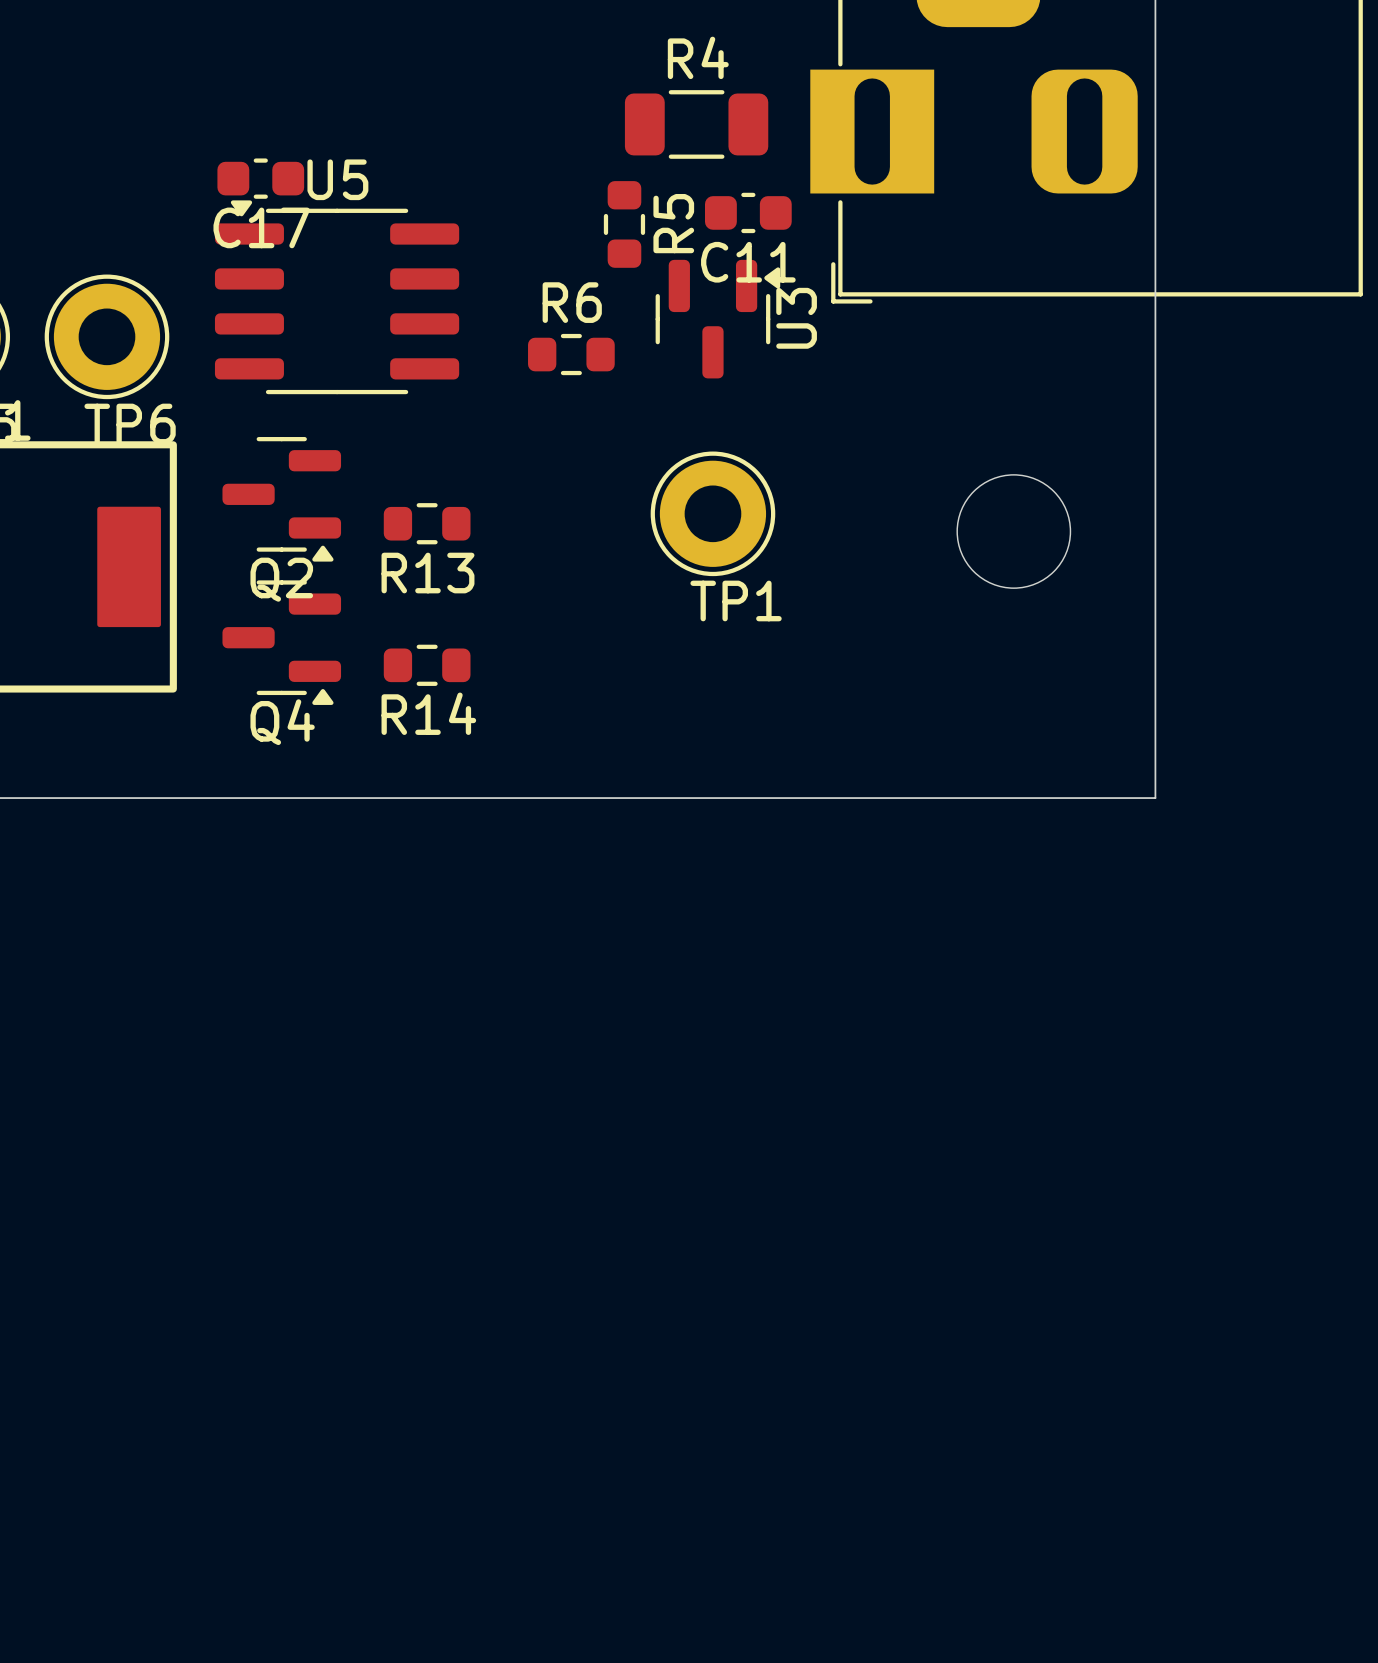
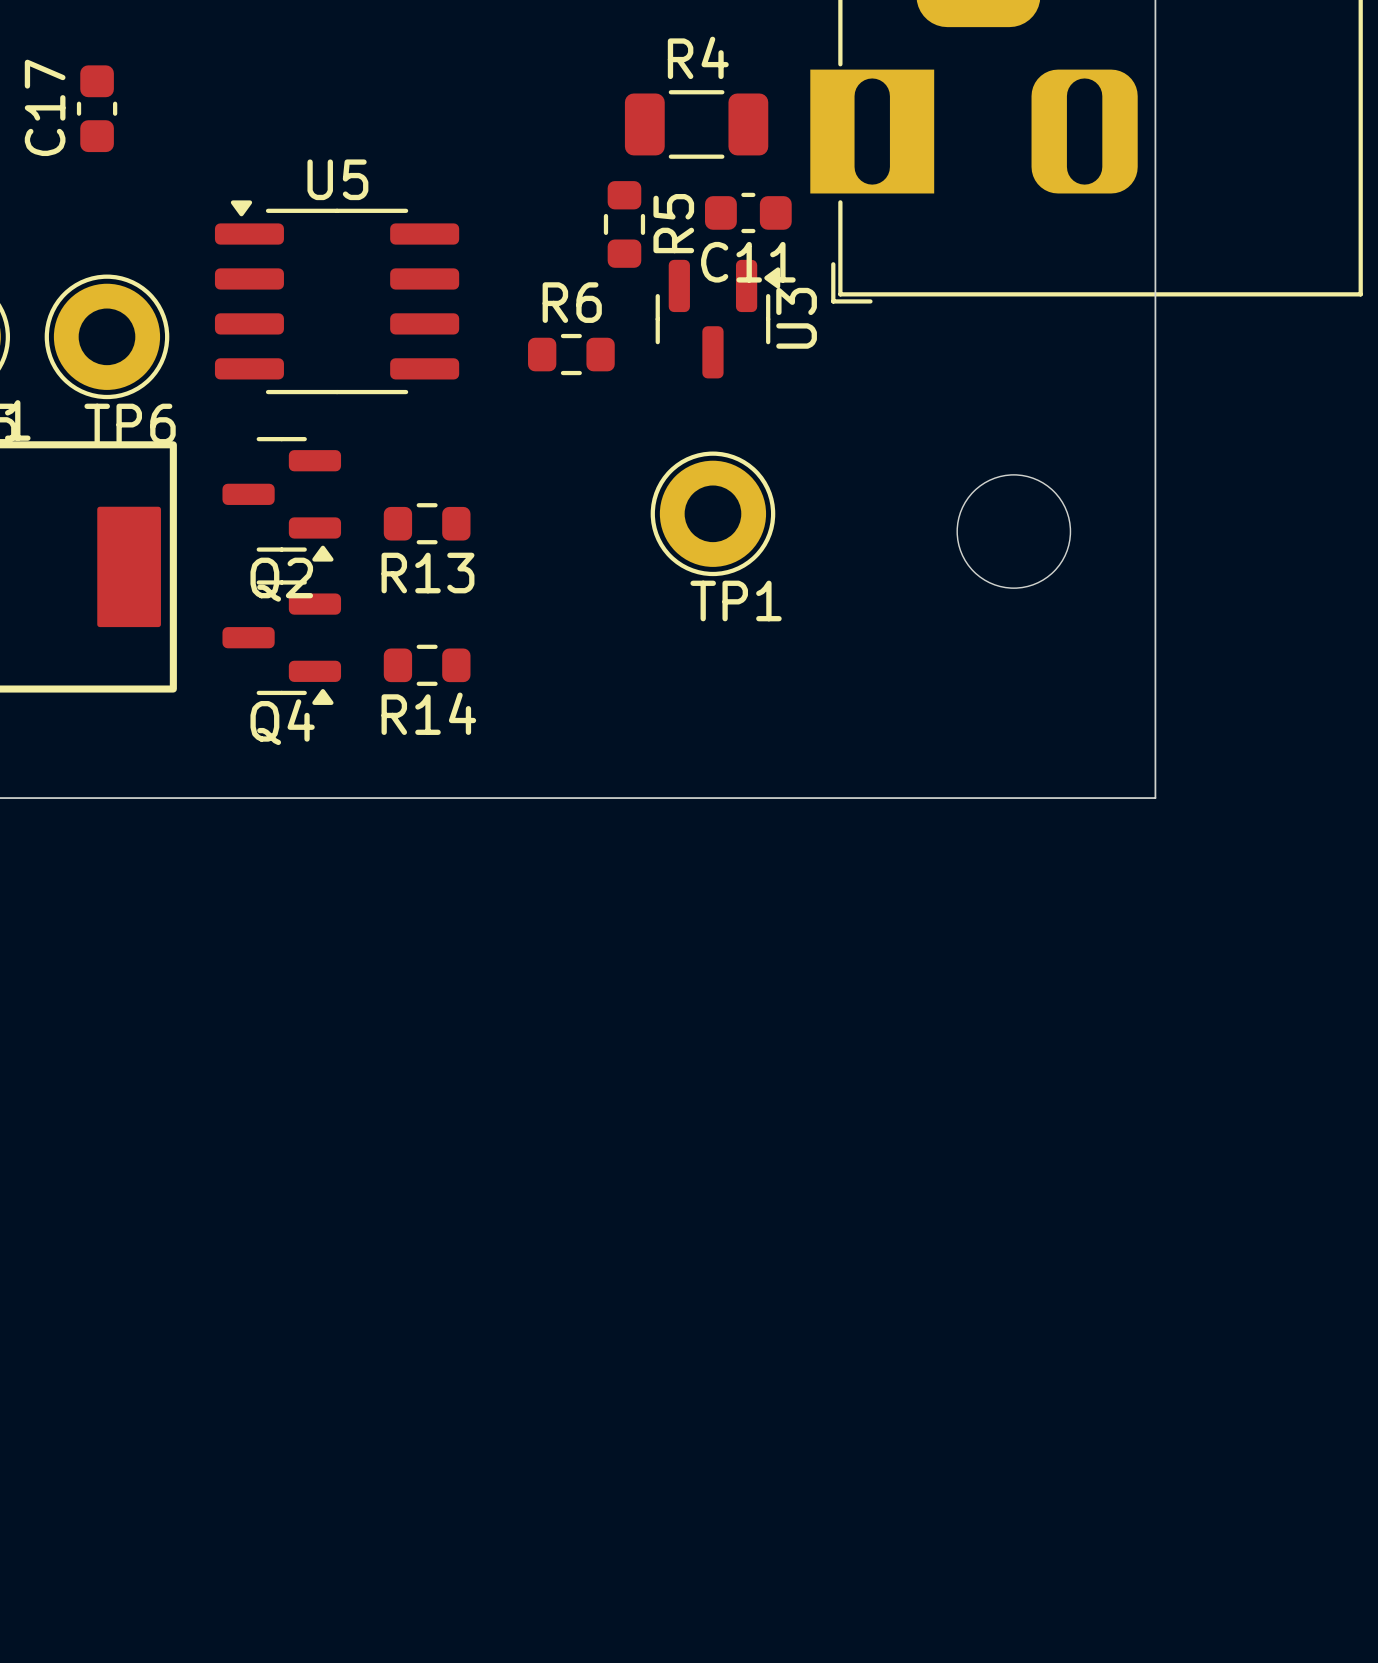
C17 rotation: 0° (260, 178) -> 90° clockwise (97, 108)
C17 position: (260, 178) -> (97, 108)

